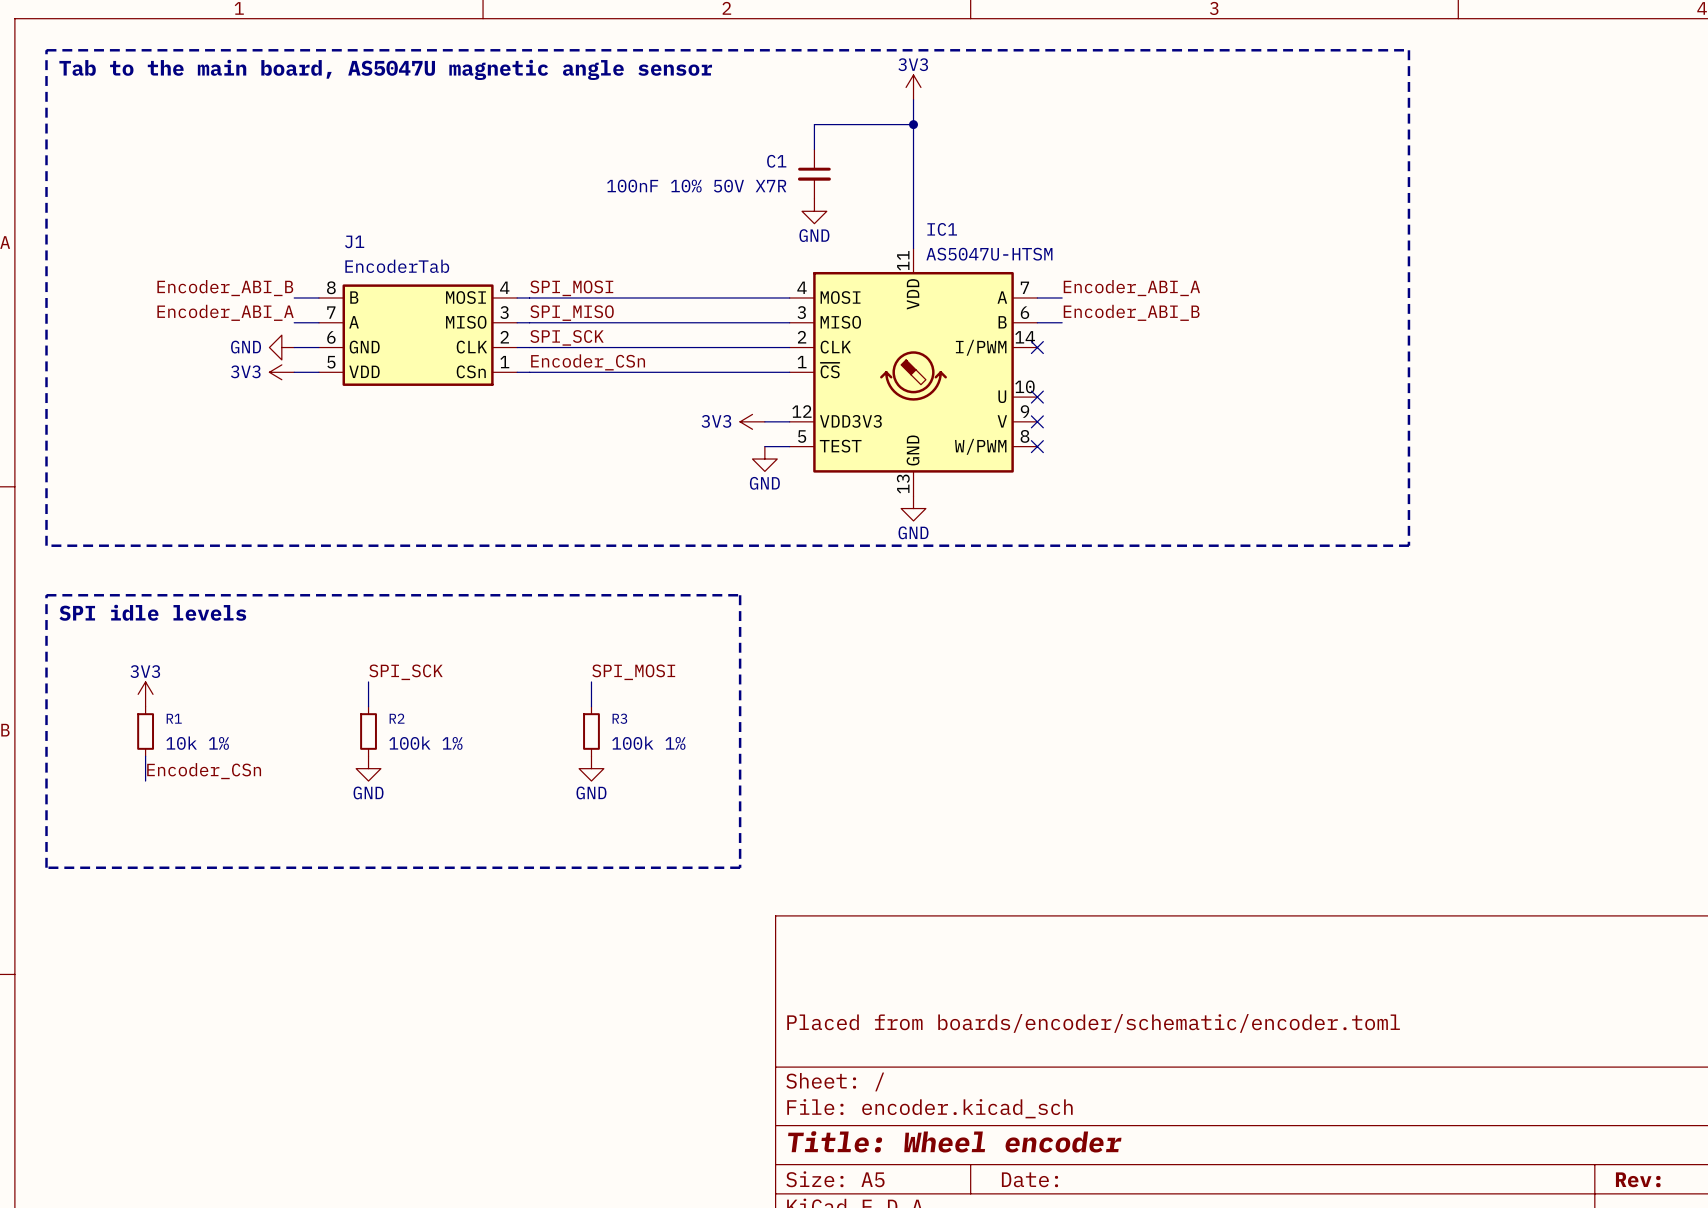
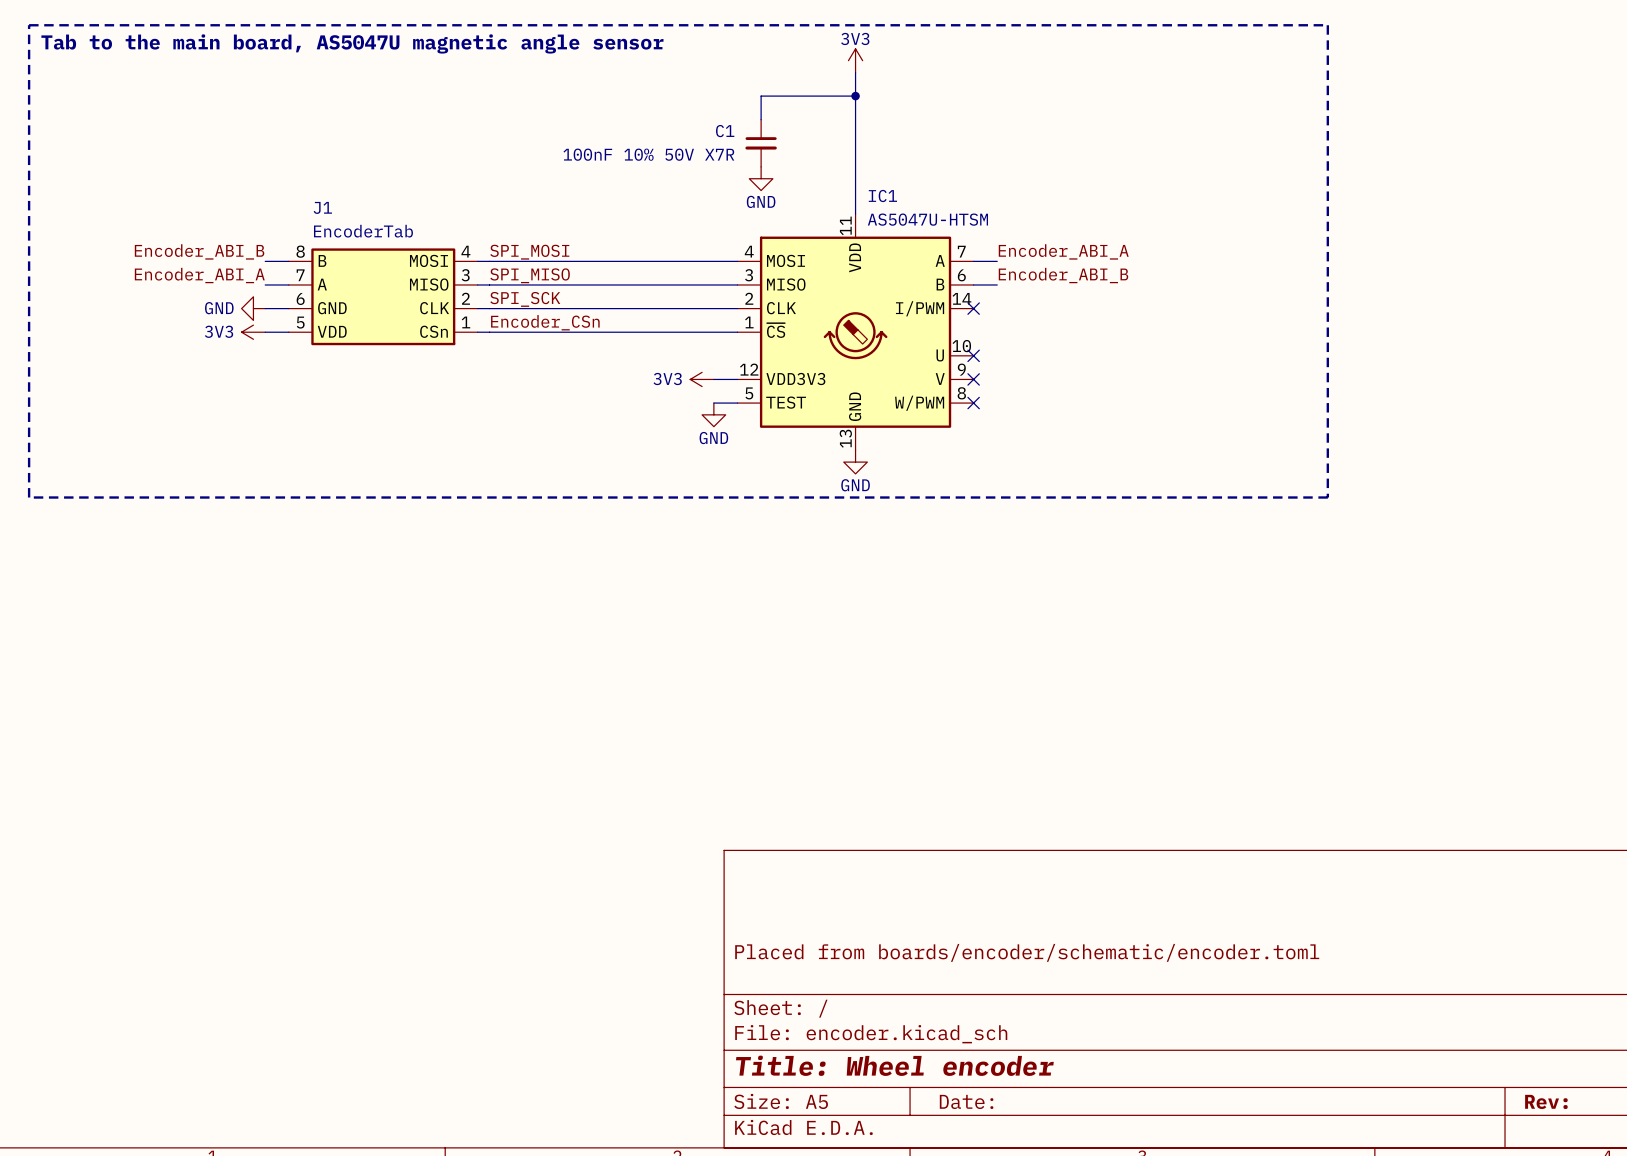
line: (46, 595) (740, 595) (740, 867) (46, 867) (46, 595) -> none
text: SPI idle levels (152, 612) -> none
label: SPI_SCK (406, 672) -> none
label: SPI_MOSI (633, 672) -> none
wire: (368, 681) (368, 706) -> none
wire: (591, 681) (591, 706) -> none
power symbol: 3V3 (145, 694) -> none
R1: 10k 1% (145, 731) -> none
R2: 100k 1% (368, 731) -> none
R3: 100k 1% (591, 731) -> none
wire: (145, 756) (145, 781) -> none
power symbol: GND (368, 768) -> none
power symbol: GND (591, 768) -> none
label: Encoder_CSn (204, 771) -> none

